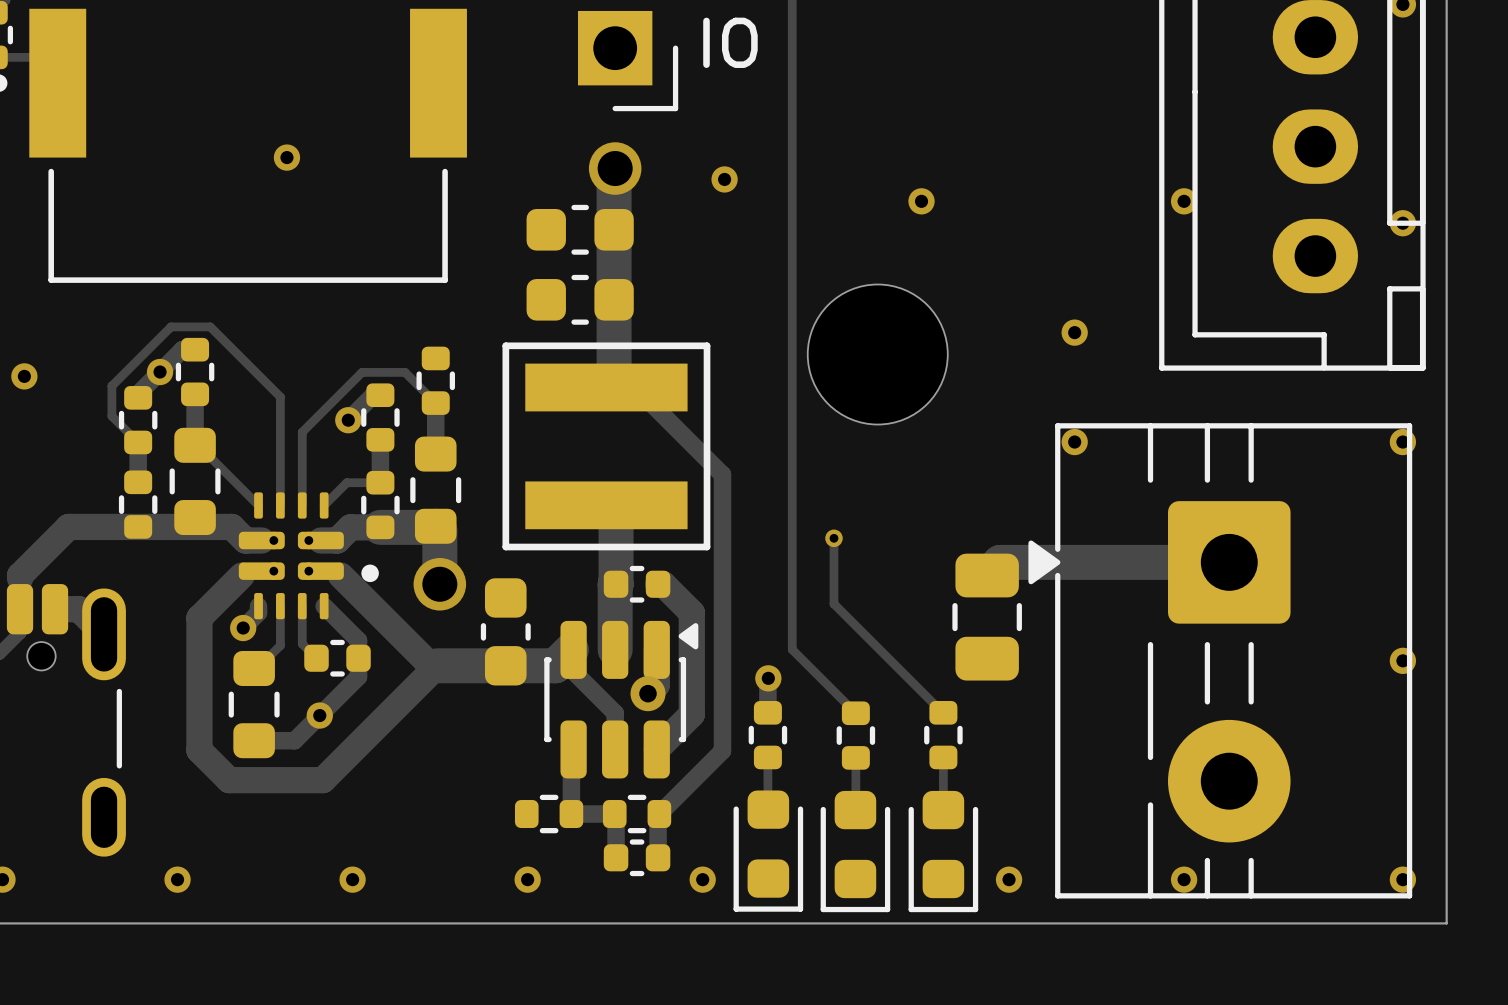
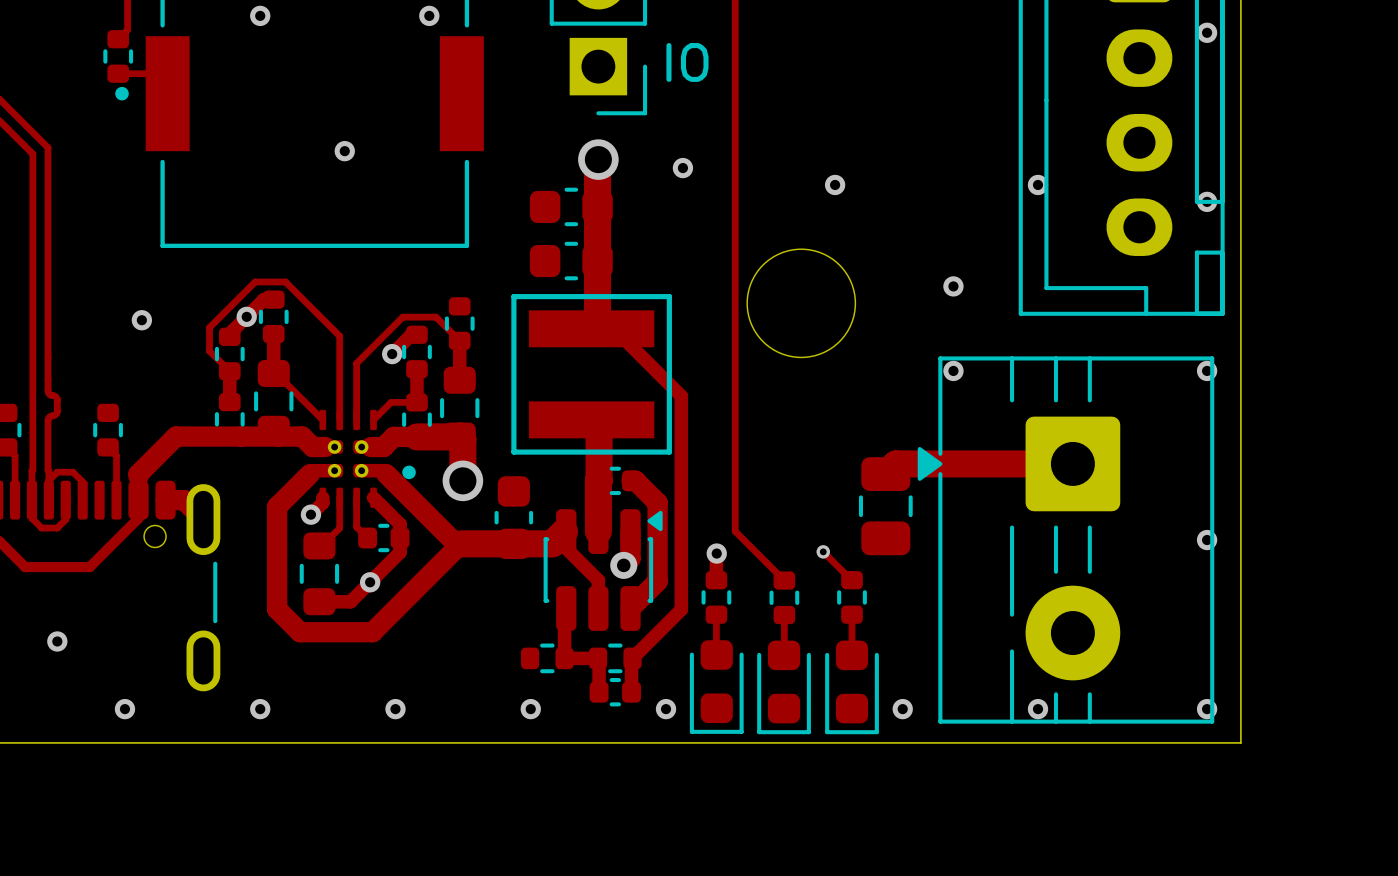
track: (833, 538) (833, 603) (906, 676) -> none
via position: (833, 538) -> (823, 551)

